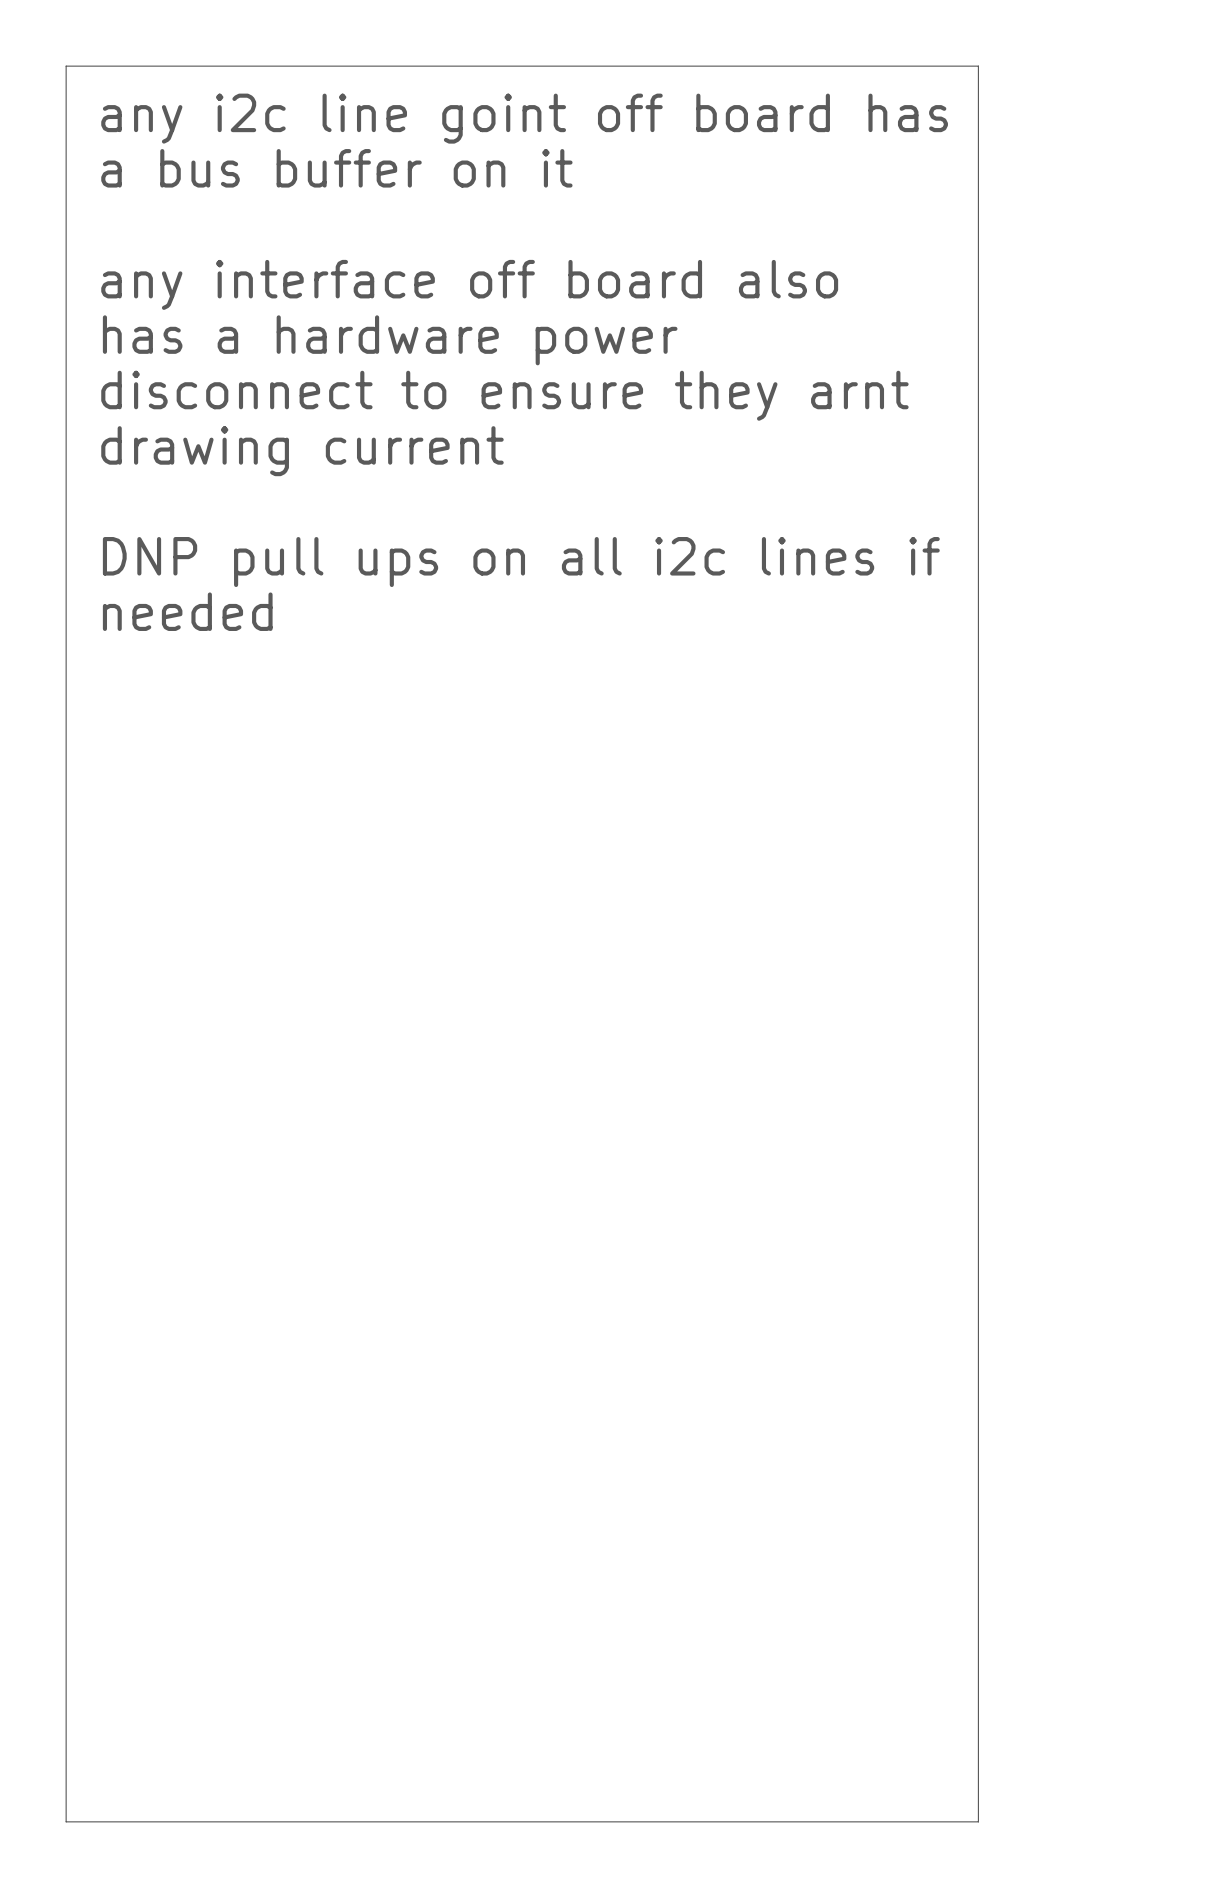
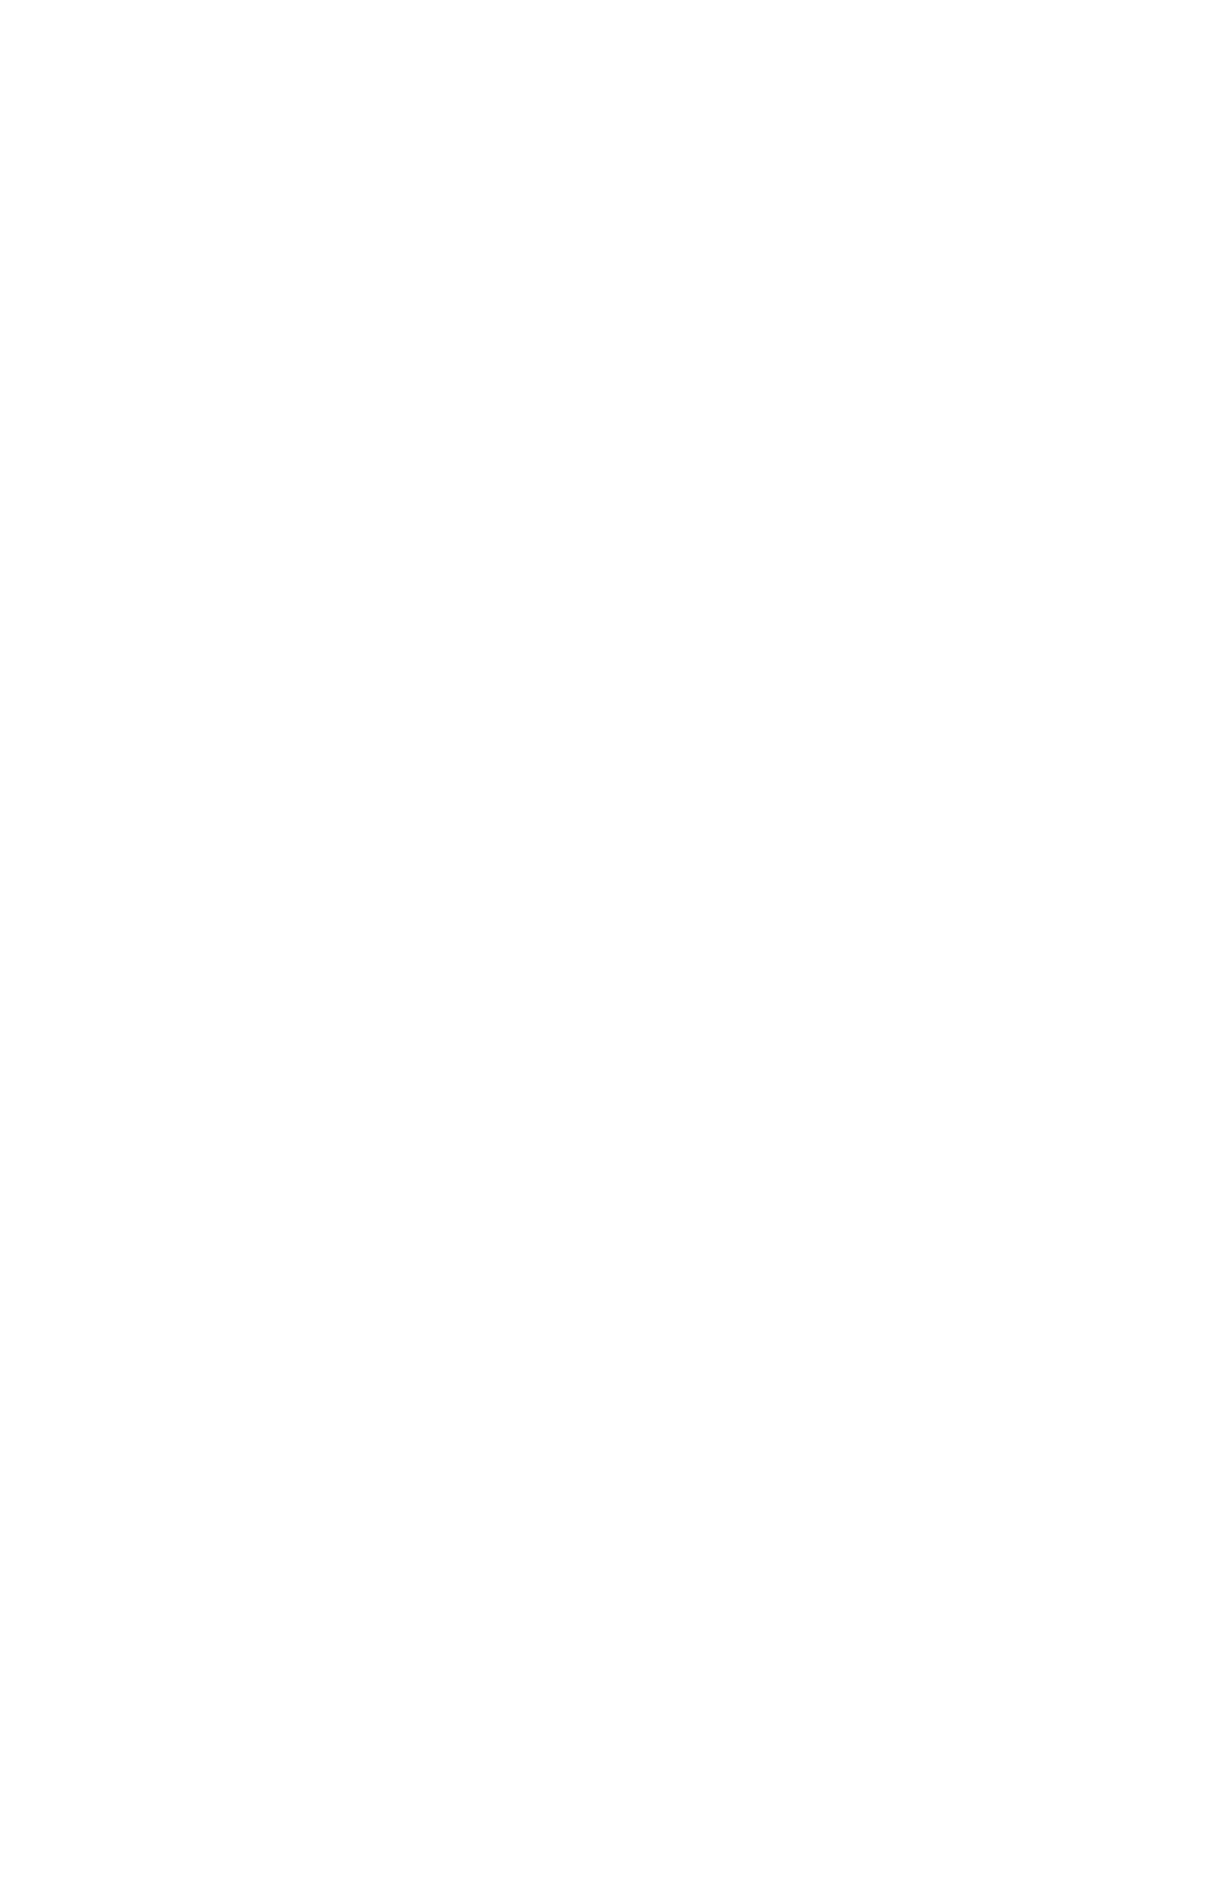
line: (66, 66) (978, 66) (978, 1821) (66, 1821) (66, 66) -> none
text: any i2c line goint off board has (524, 118) -> none
text: a bus buffer on it (336, 168) -> none
text: any interface off board also (469, 284) -> none
text: has a hardware power (390, 340) -> none
text: disconnect to ensure they arnt (504, 395) -> none
text: drawing current (302, 451) -> none
text: DNP pull ups on all i2c lines if (521, 562) -> none
text: needed (187, 611) -> none

